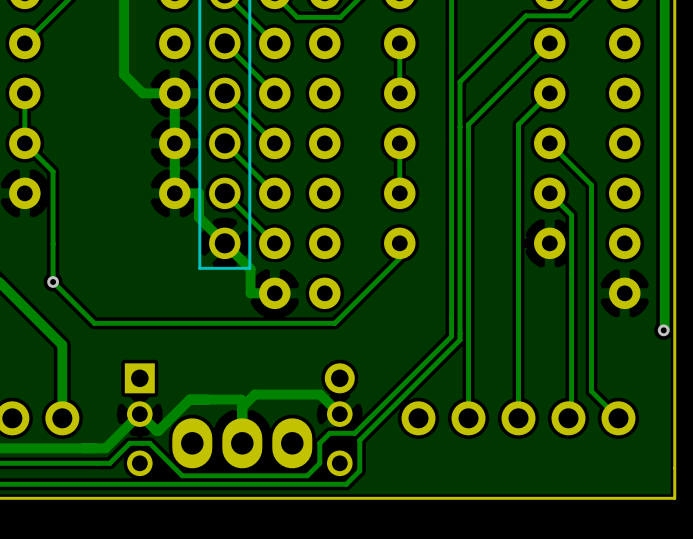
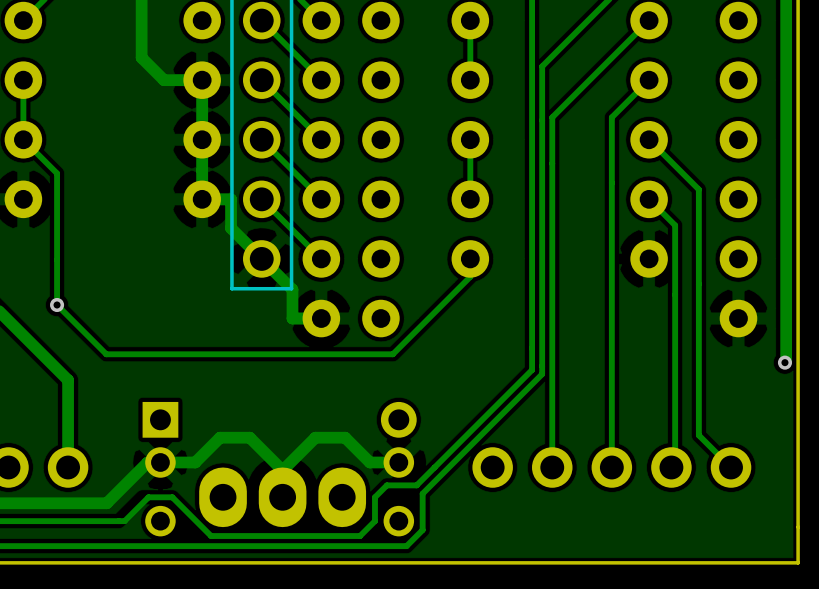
track: (242, 407) (254, 394) (320, 394) (339, 414) -> (162, 462) (195, 462) (220, 437) (249, 437) (282, 470) (315, 437) (345, 437) (369, 462) (398, 462)
track: (242, 420) (241, 399) (189, 399) (158, 430) (139, 414) (105, 448) (94, 448) -> (160, 462) (147, 462) (106, 503)

